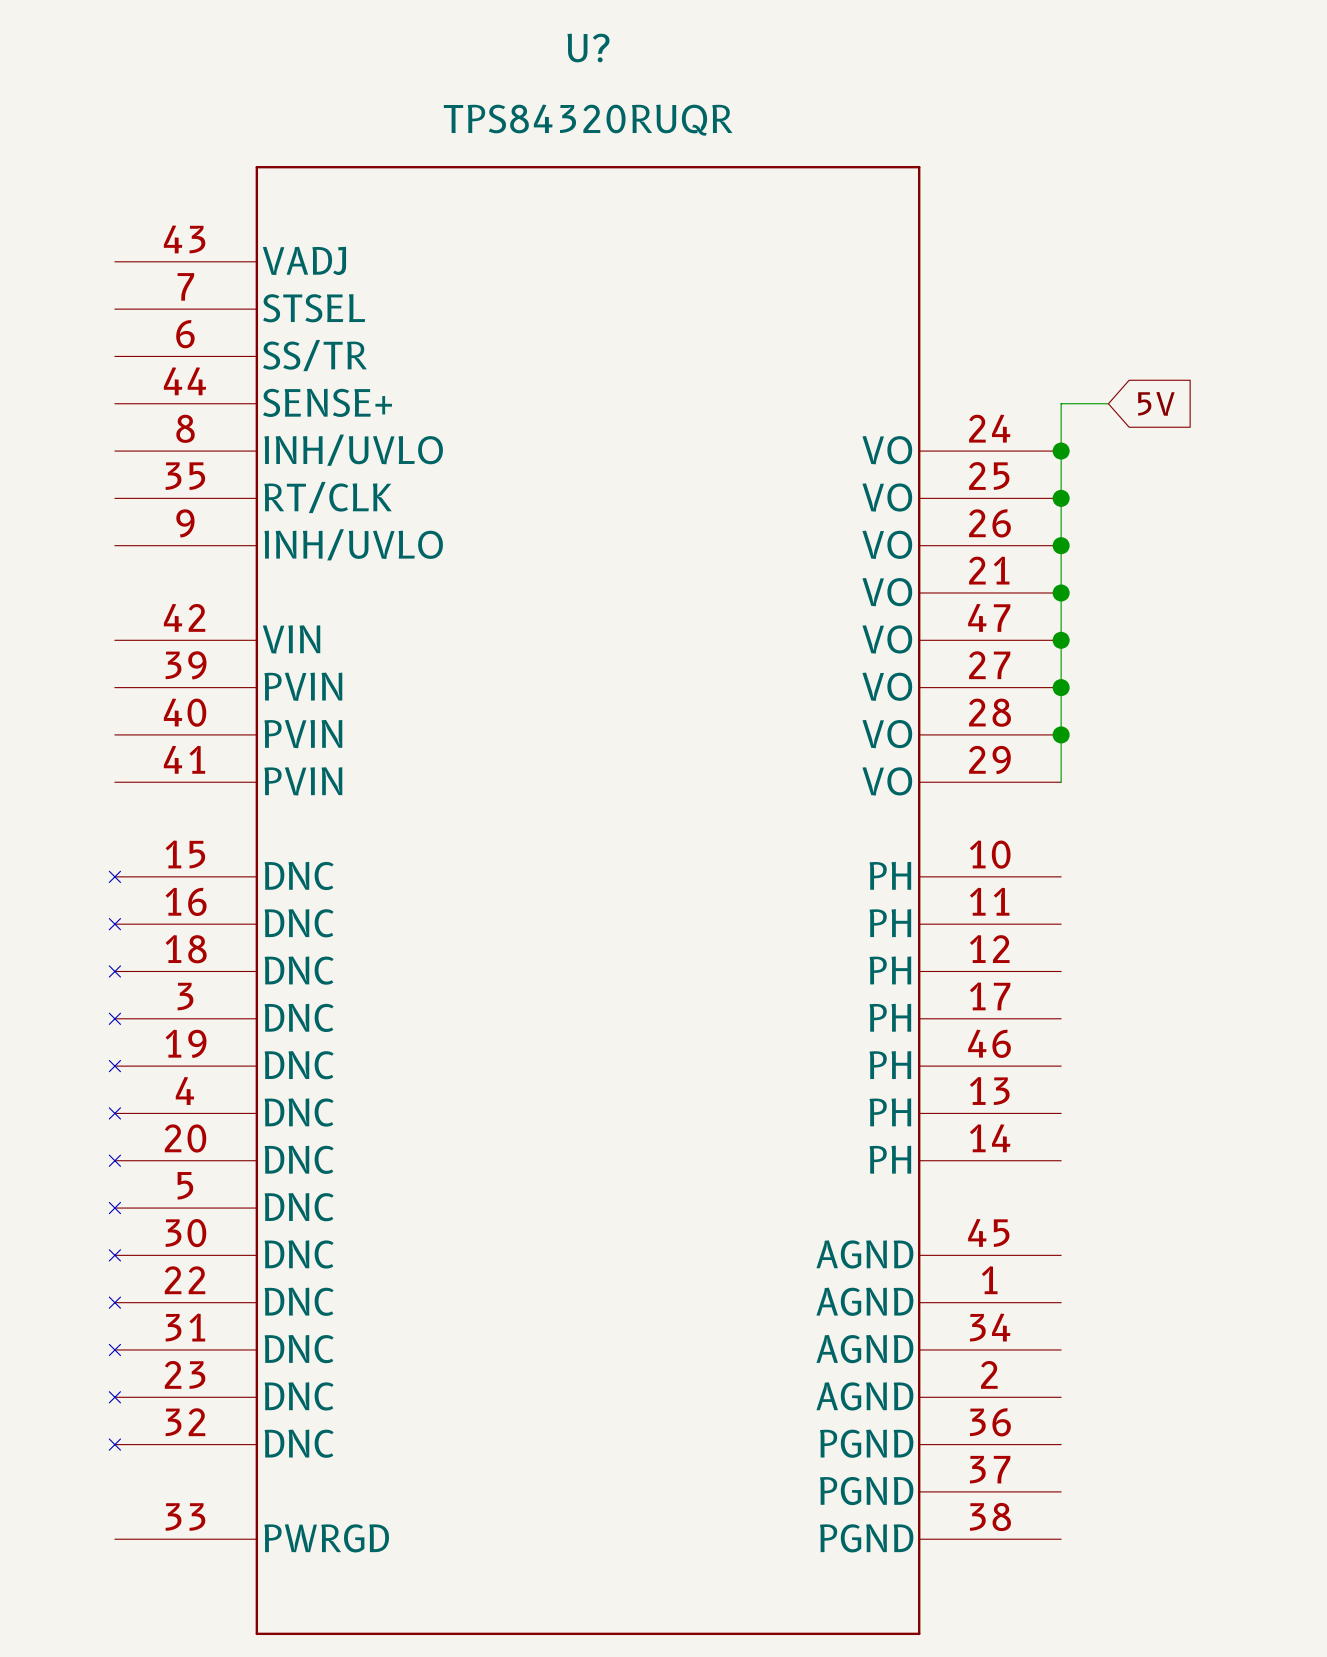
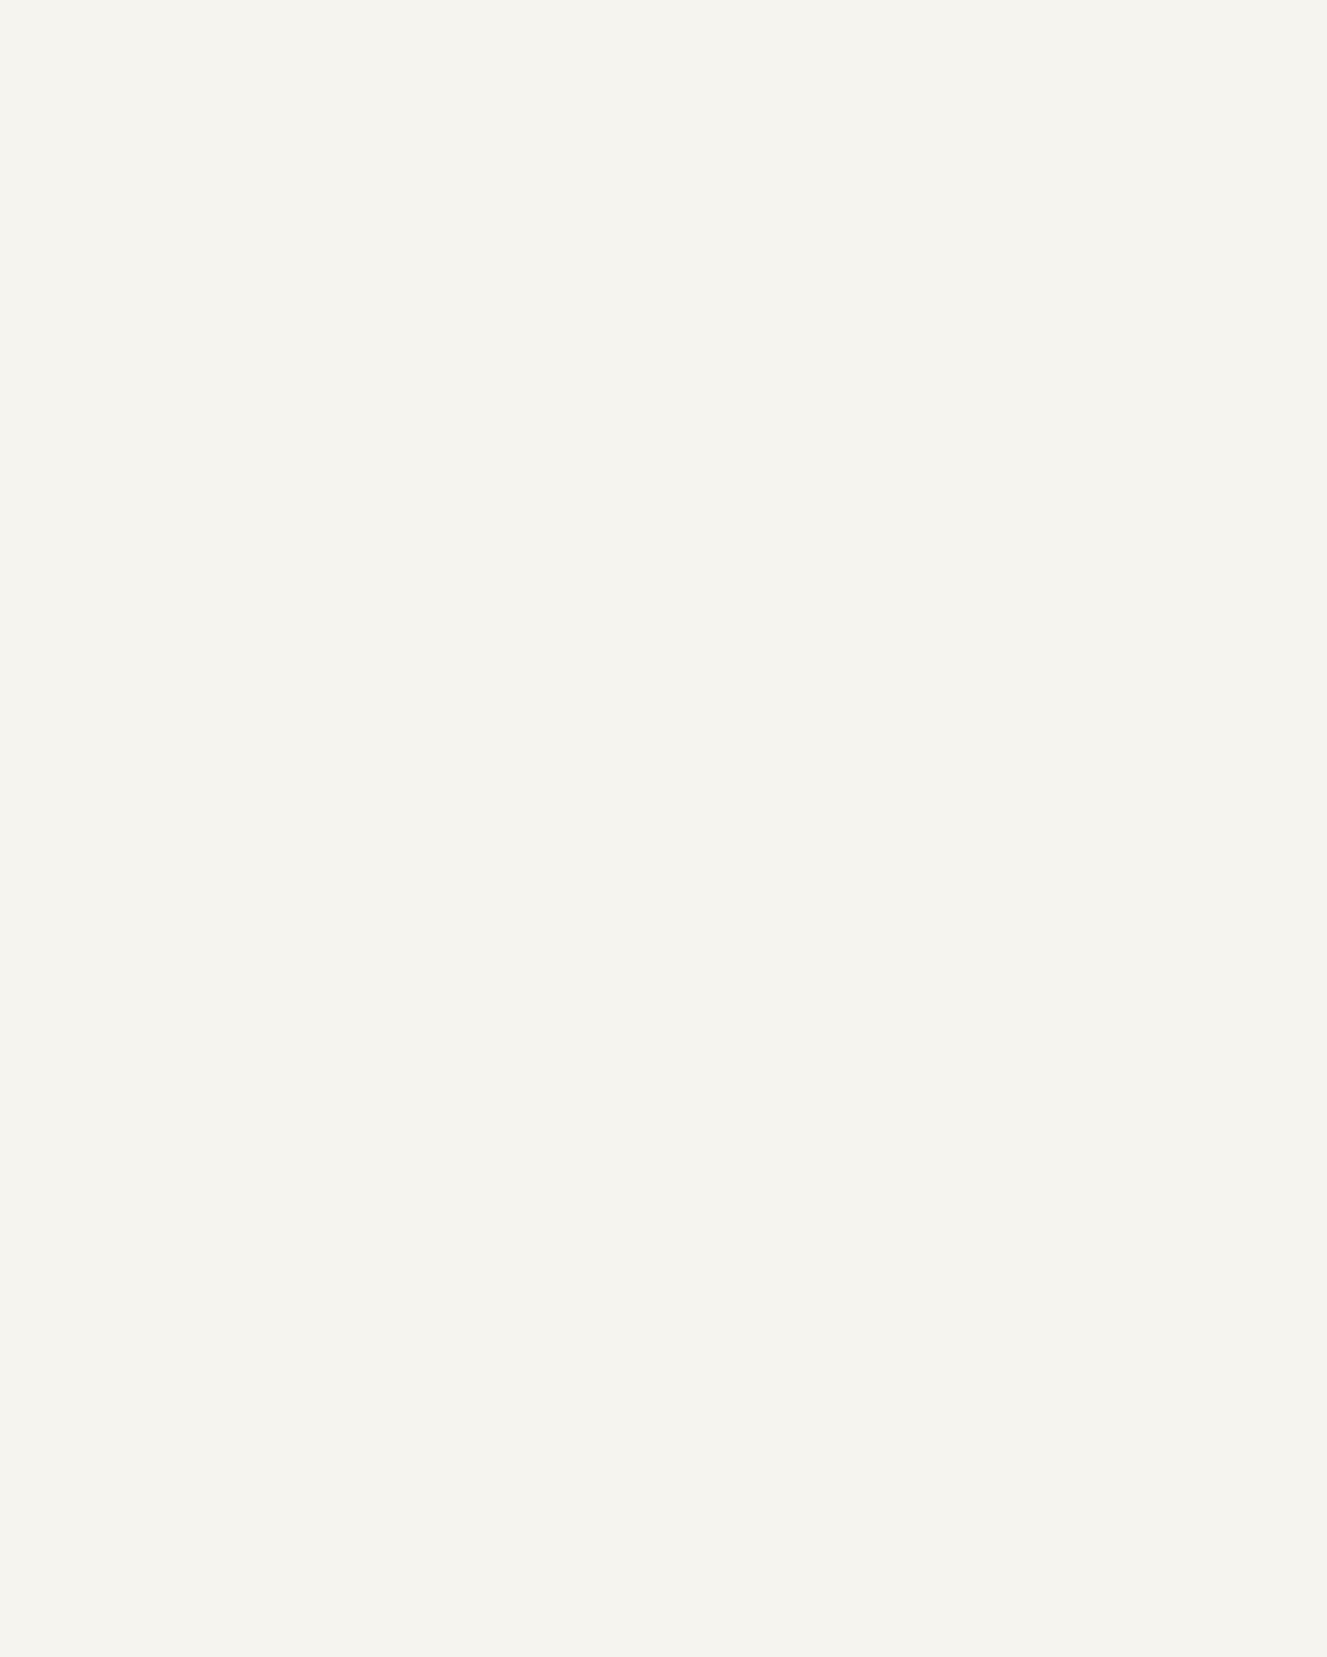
wire: (1108, 403) (1061, 403) (1061, 782) -> none
global label: 5V (1156, 403) -> none
junction: (1061, 451) -> none
junction: (1061, 498) -> none
junction: (1061, 545) -> none
junction: (1061, 592) -> none
junction: (1061, 640) -> none
junction: (1061, 687) -> none
junction: (1061, 734) -> none
U?: TPS84320RUQR (585, 900) -> none

